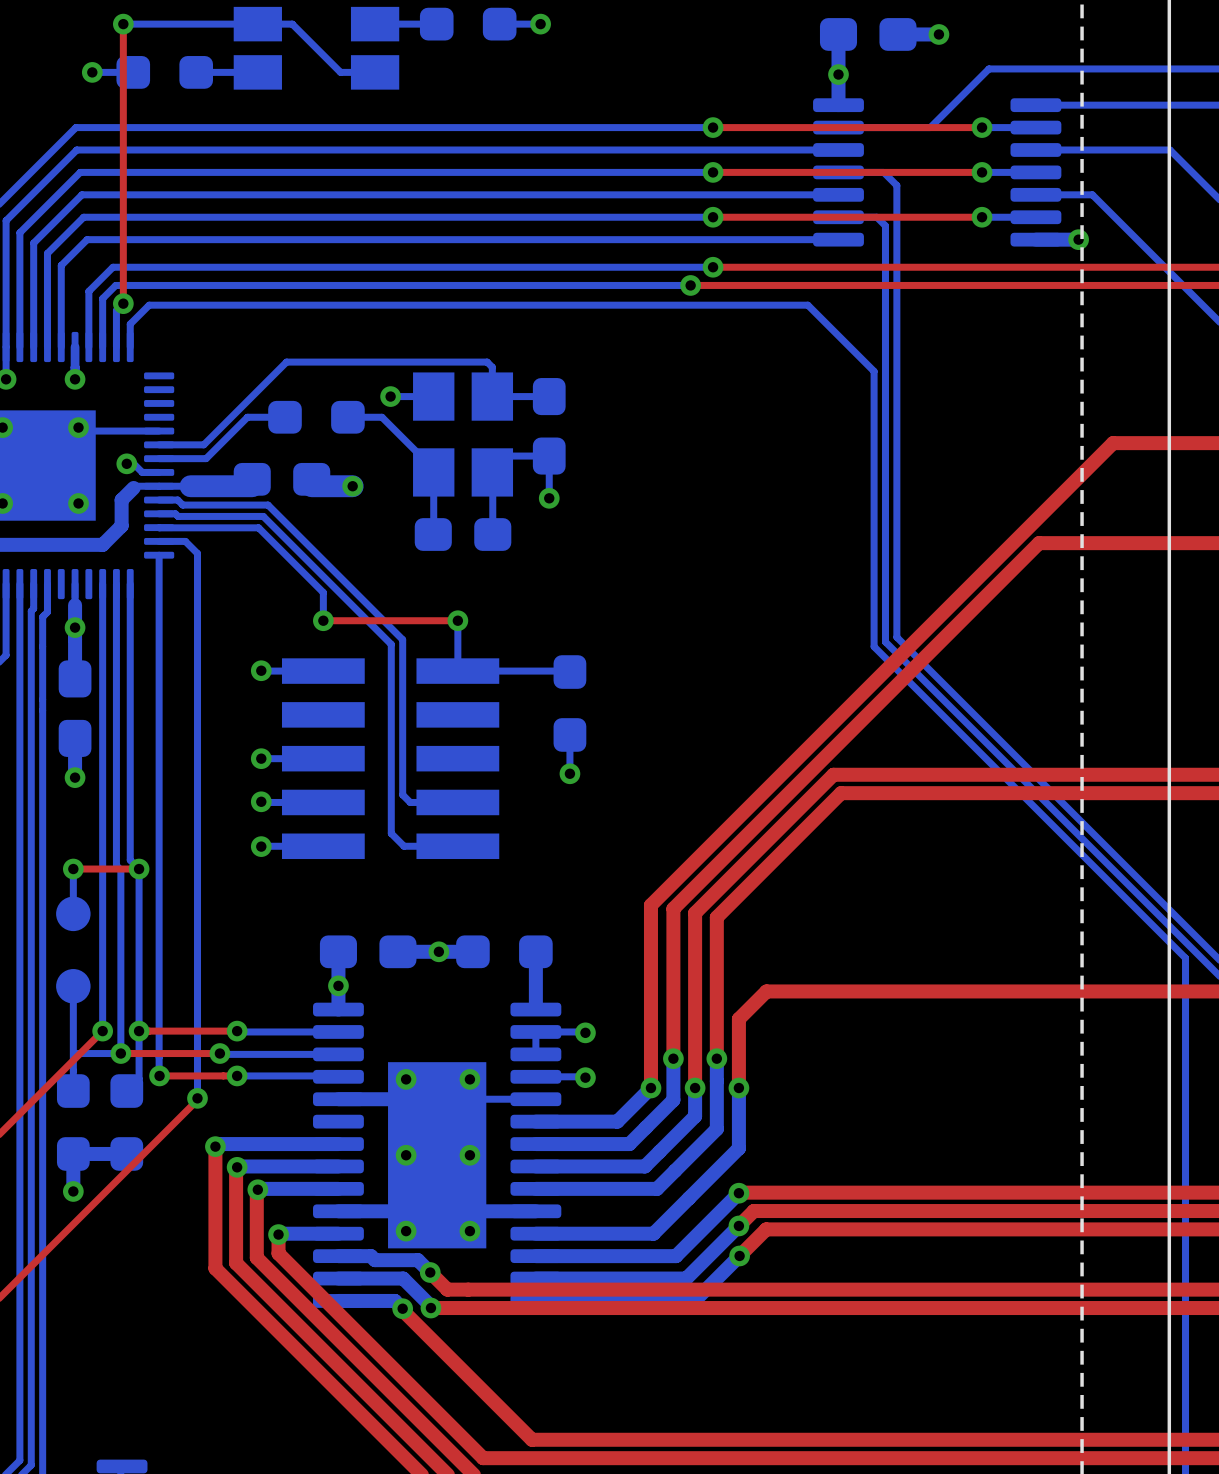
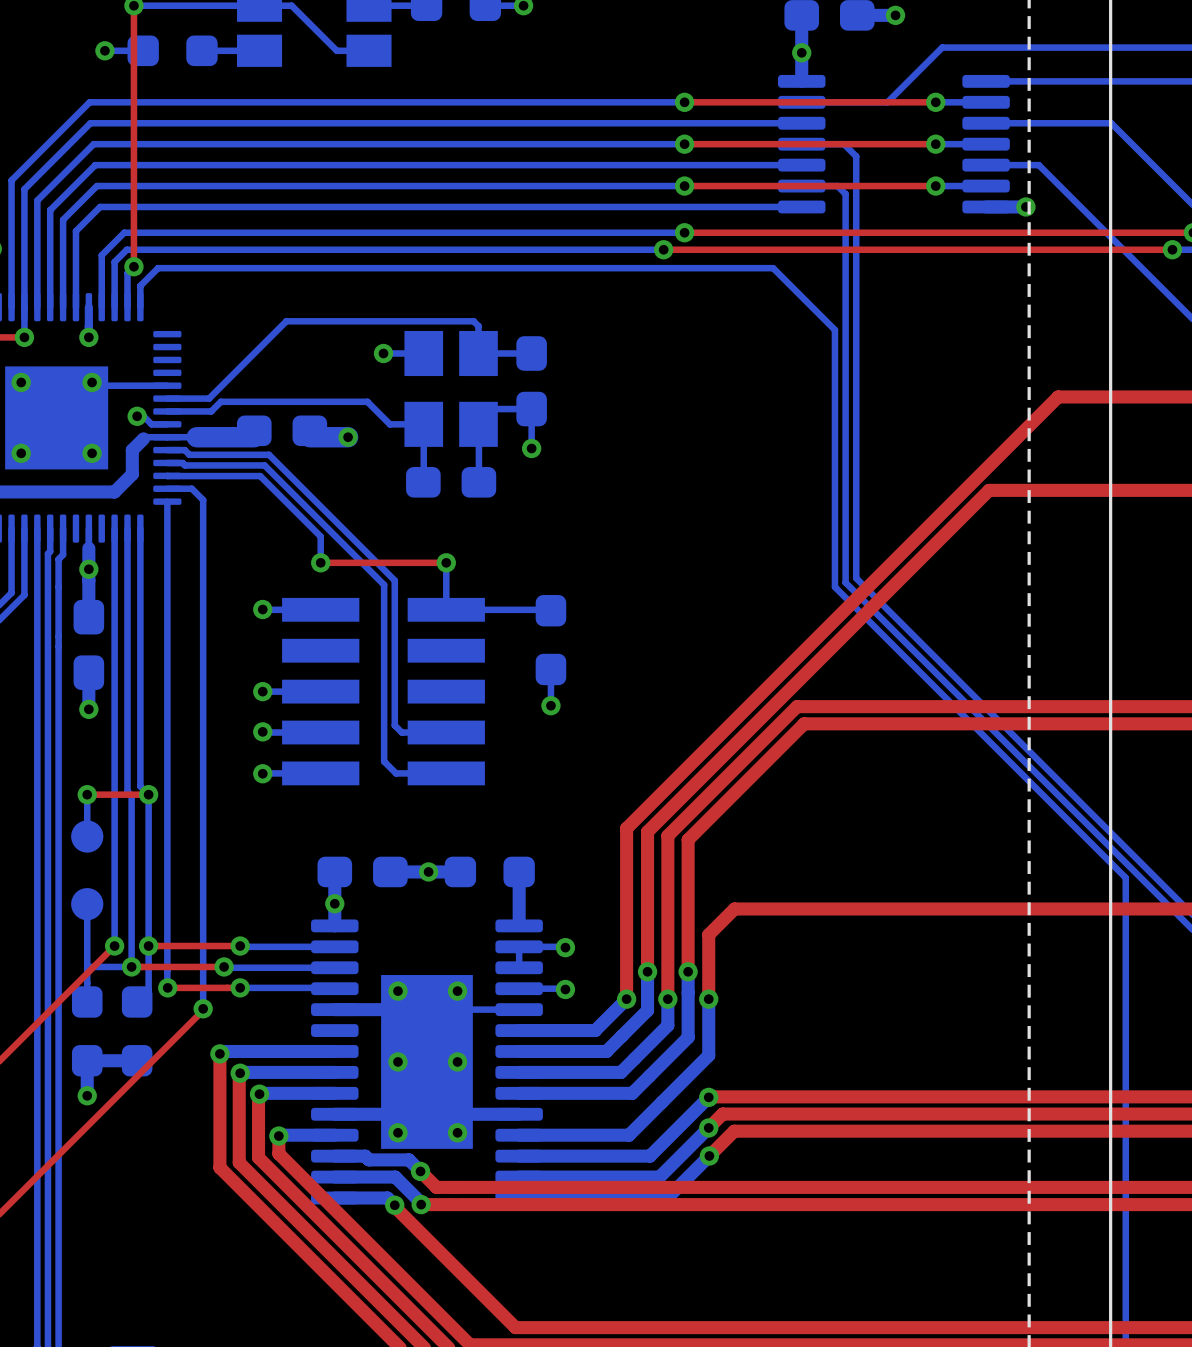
bottom track: (285, 417) (247, 417) (216, 448) -> none
part: (316, 417) -> none
bottom track: (347, 417) (381, 417) (433, 468) (433, 472) -> (220, 401) (367, 401) (389, 424) (423, 424)

